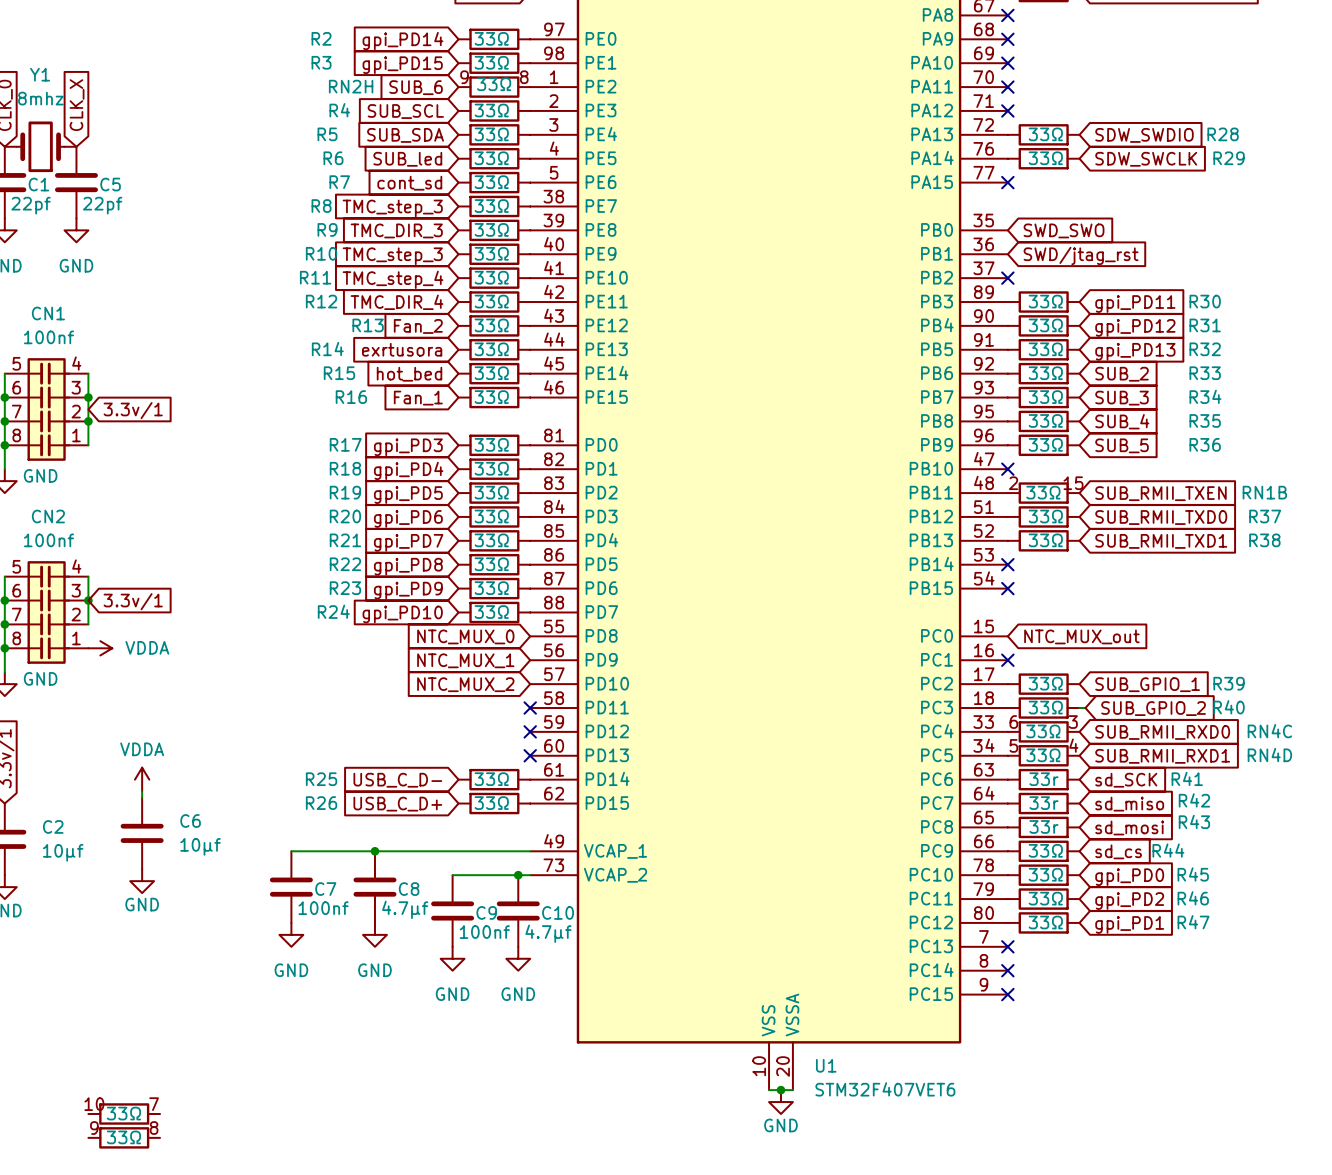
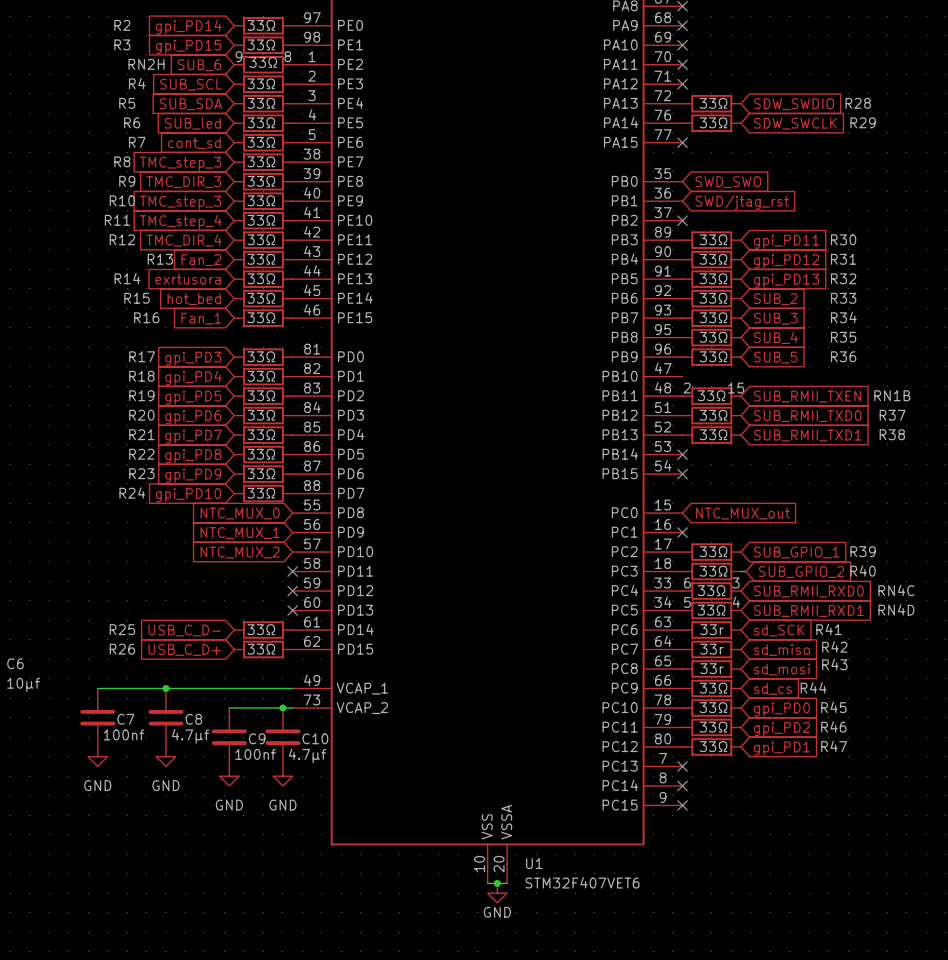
no-connect mark: (1007, 469) -> none

